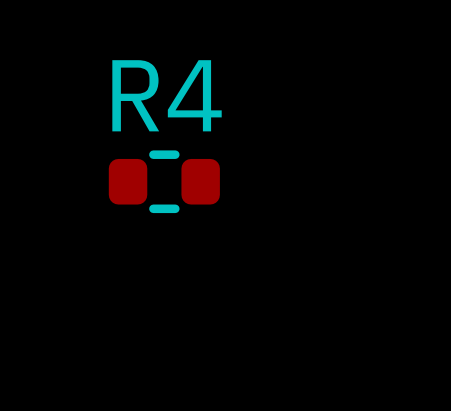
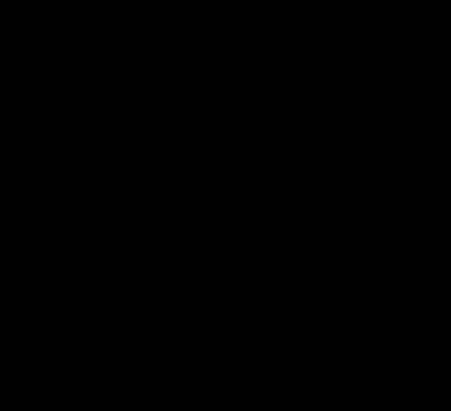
R4: (164, 181) -> none

